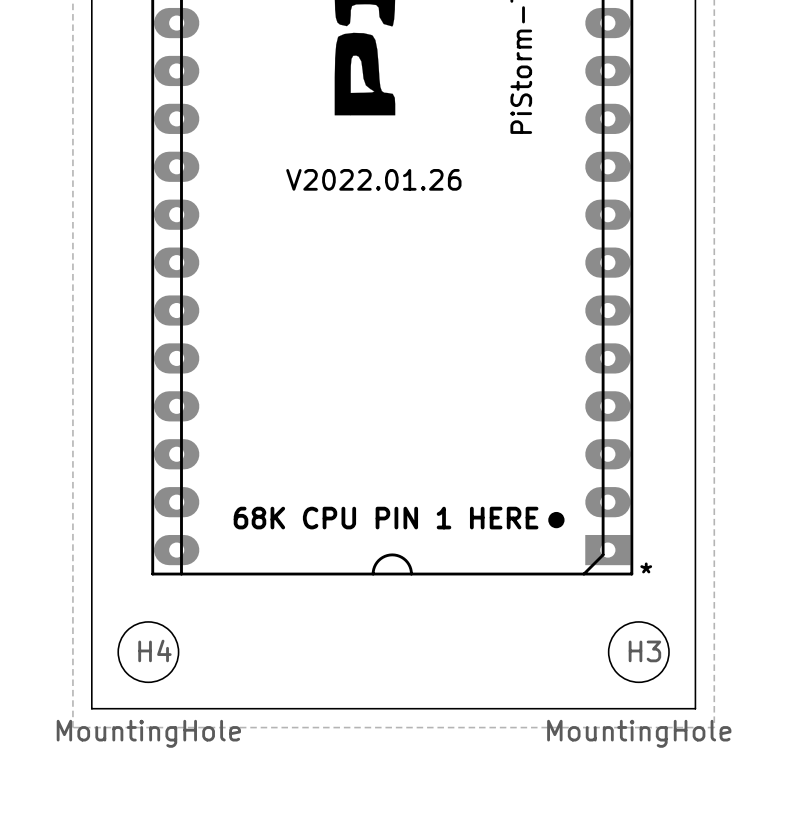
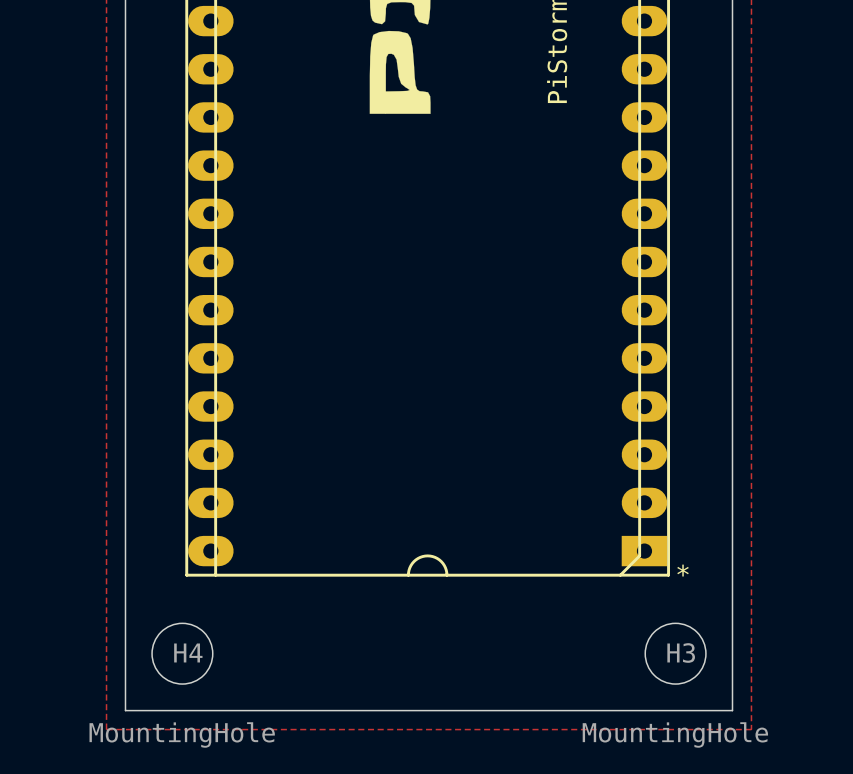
text: V2022.01.26 (373, 179) -> none
drawing: [548, 511, 565, 529] -> none
text: 68K CPU PIN 1 HERE (386, 518) -> none

